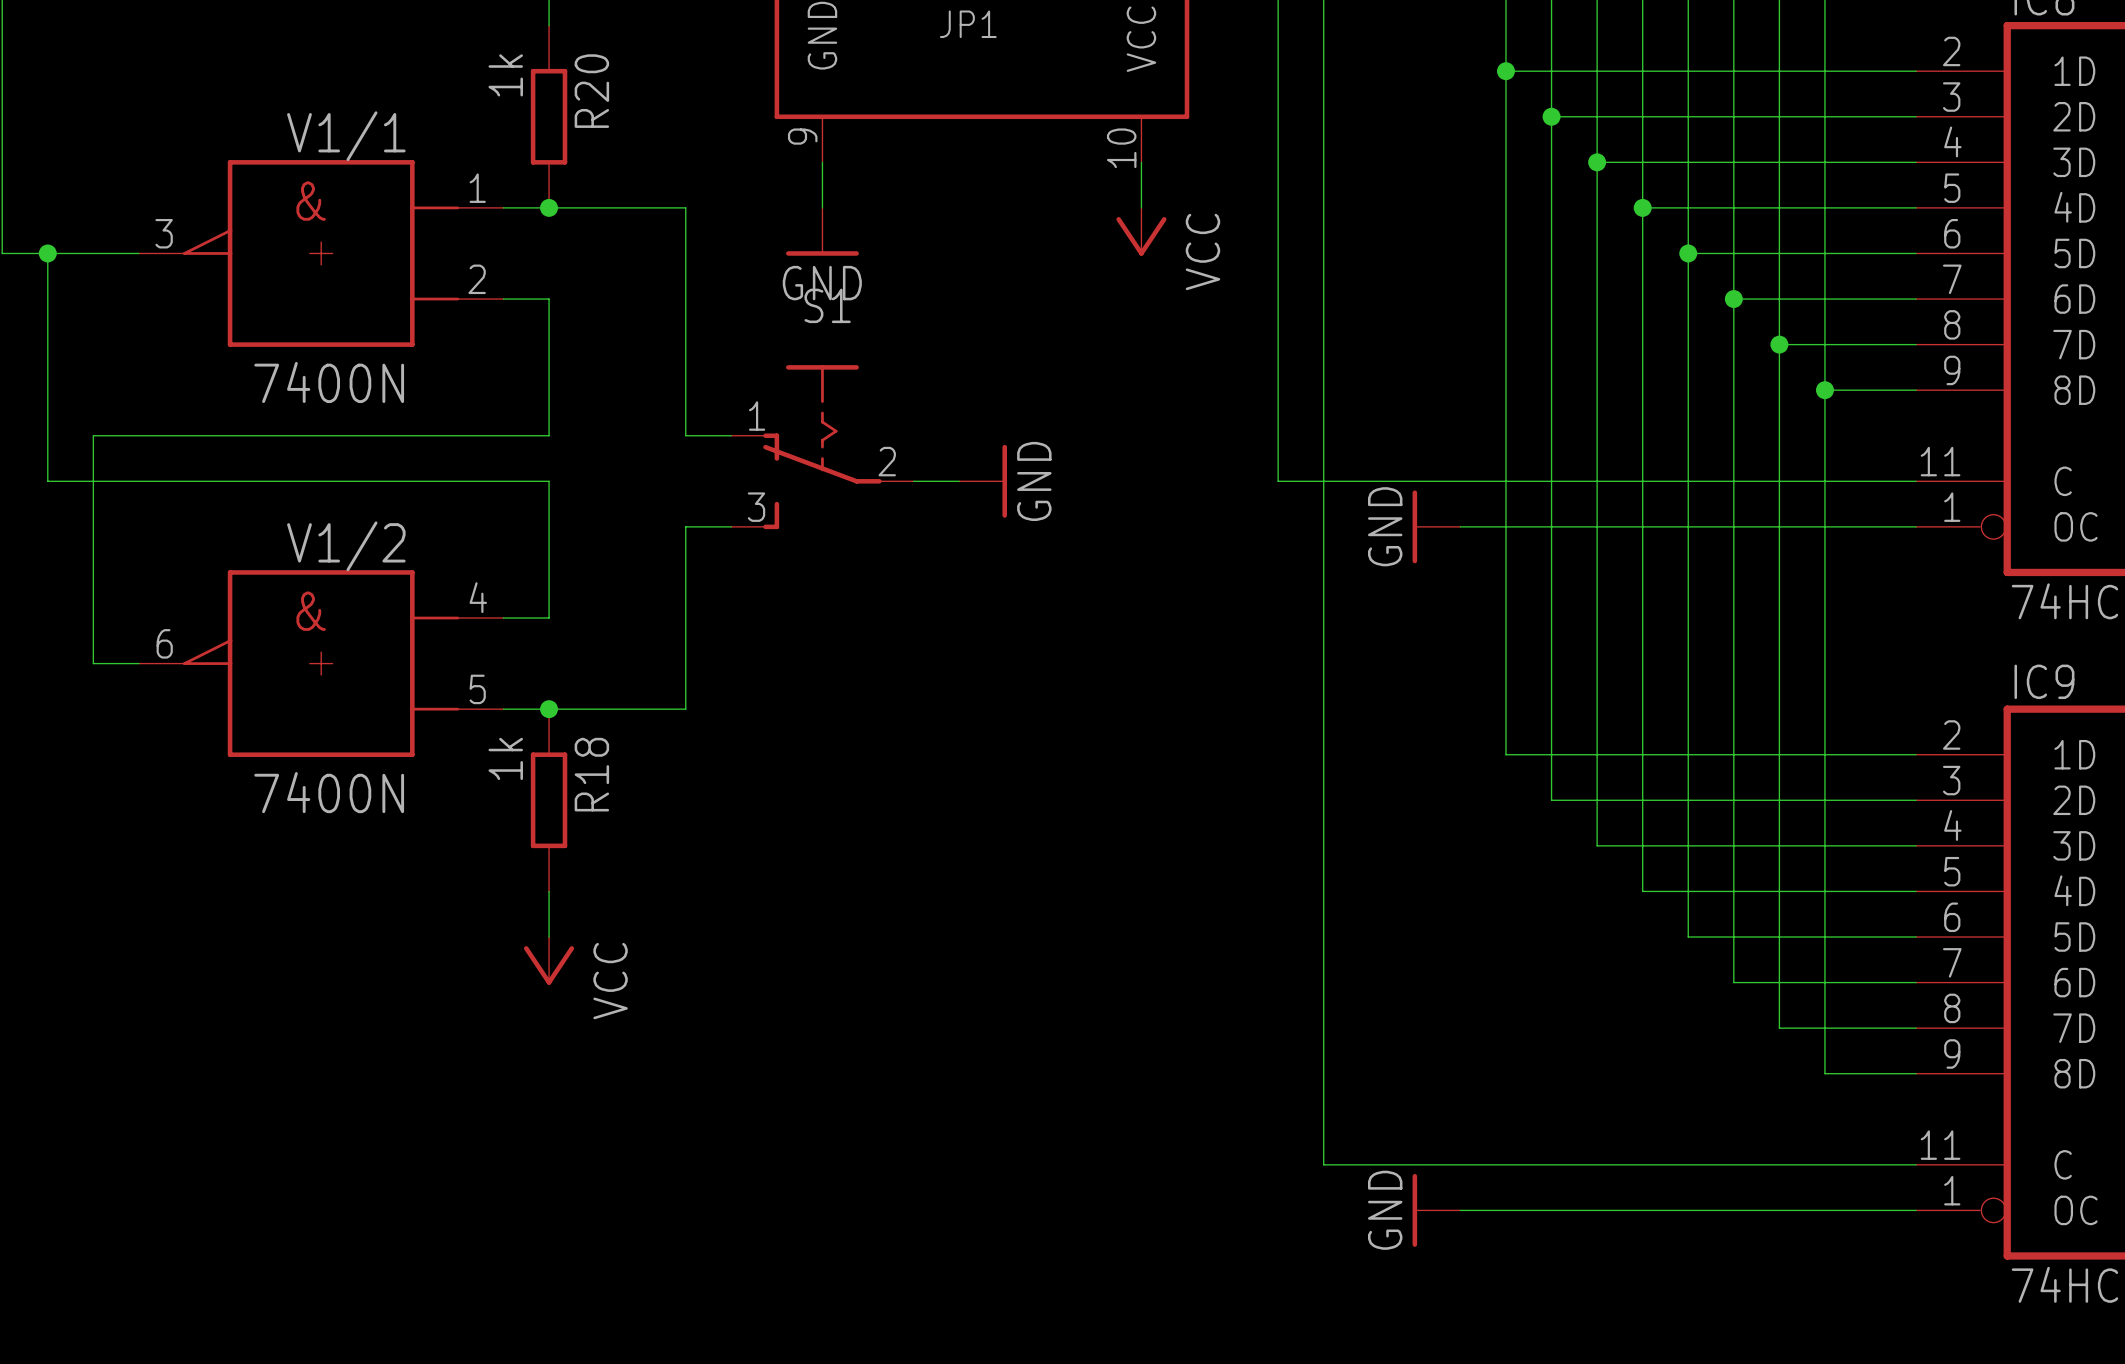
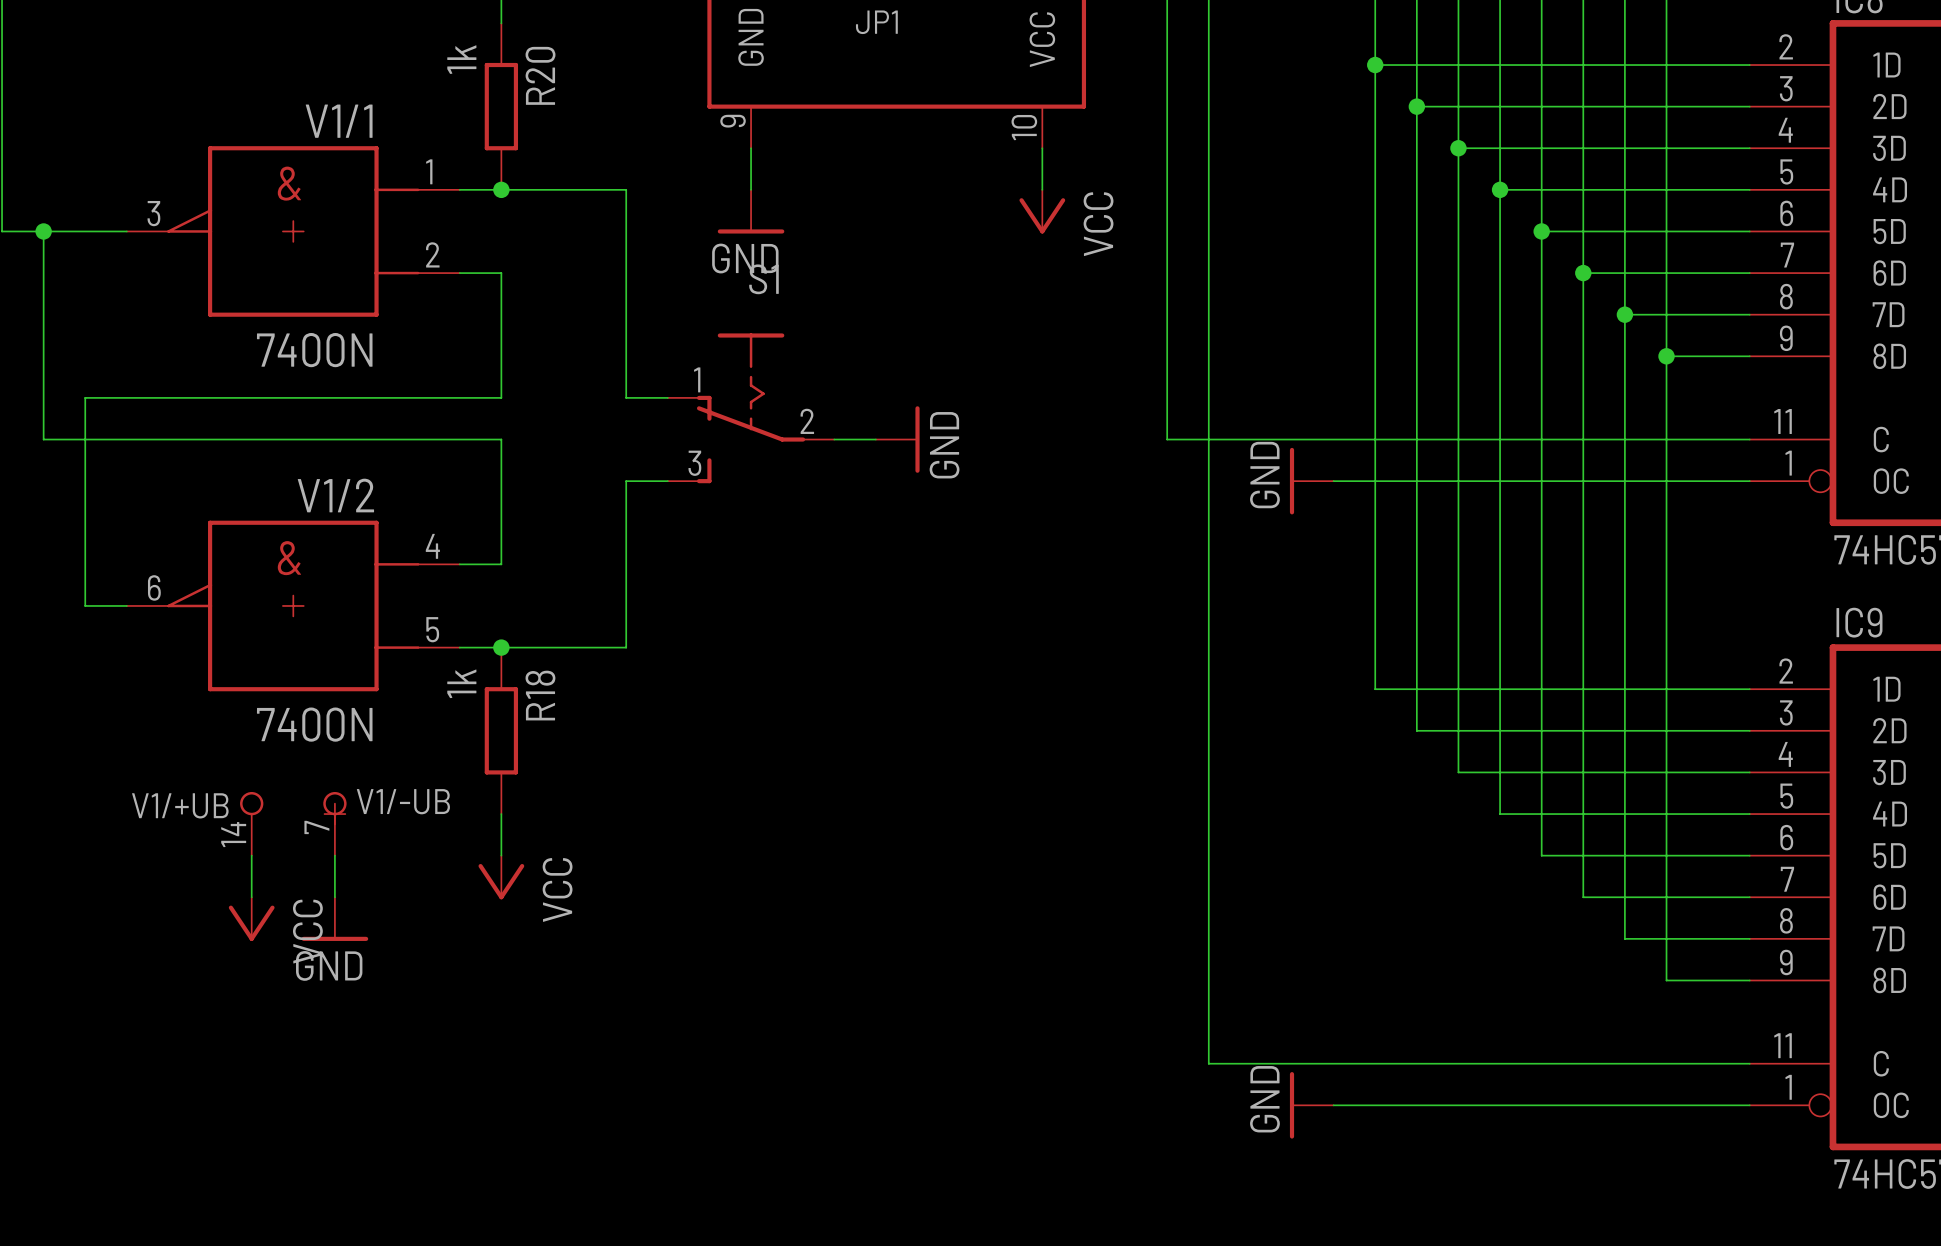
V1/+UB: none -> (251, 823)
V1/-UB: none -> (334, 823)
wire: none -> (251, 855) (251, 897)
wire: none -> (334, 855) (334, 897)
power symbol: none -> VCC (251, 919)
power symbol: none -> GND (334, 919)

